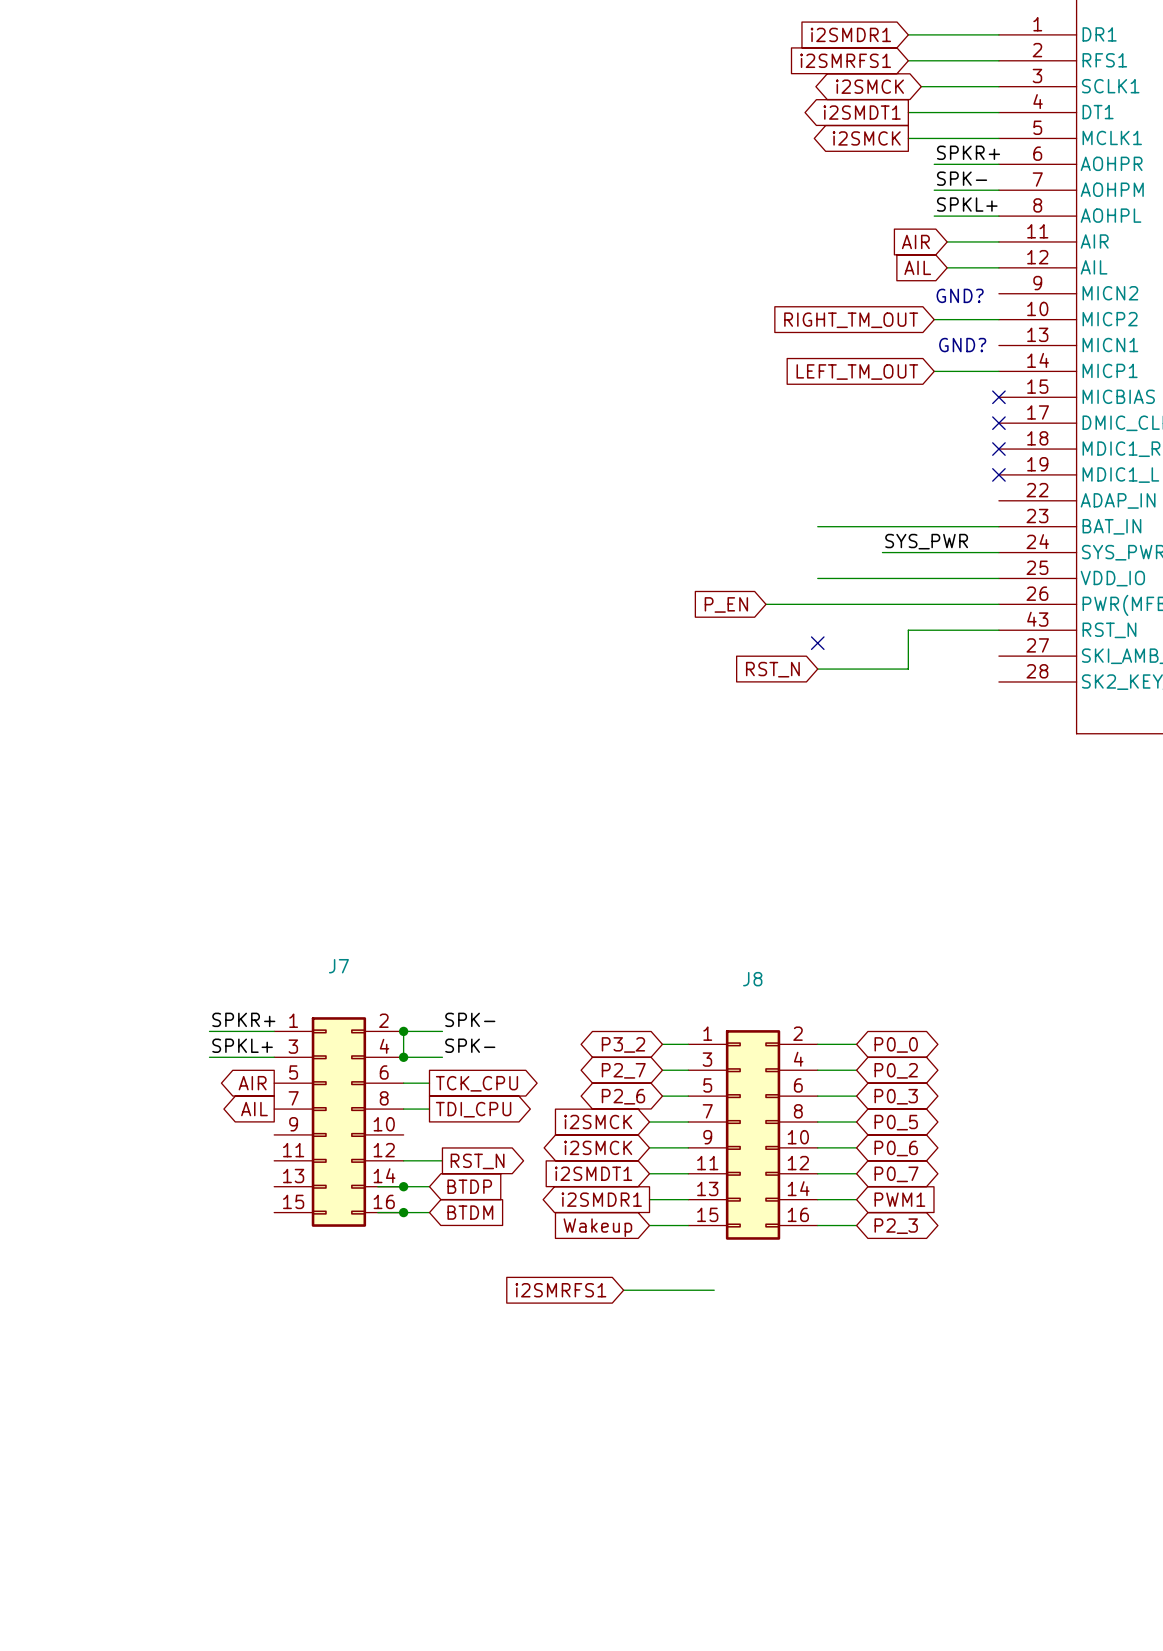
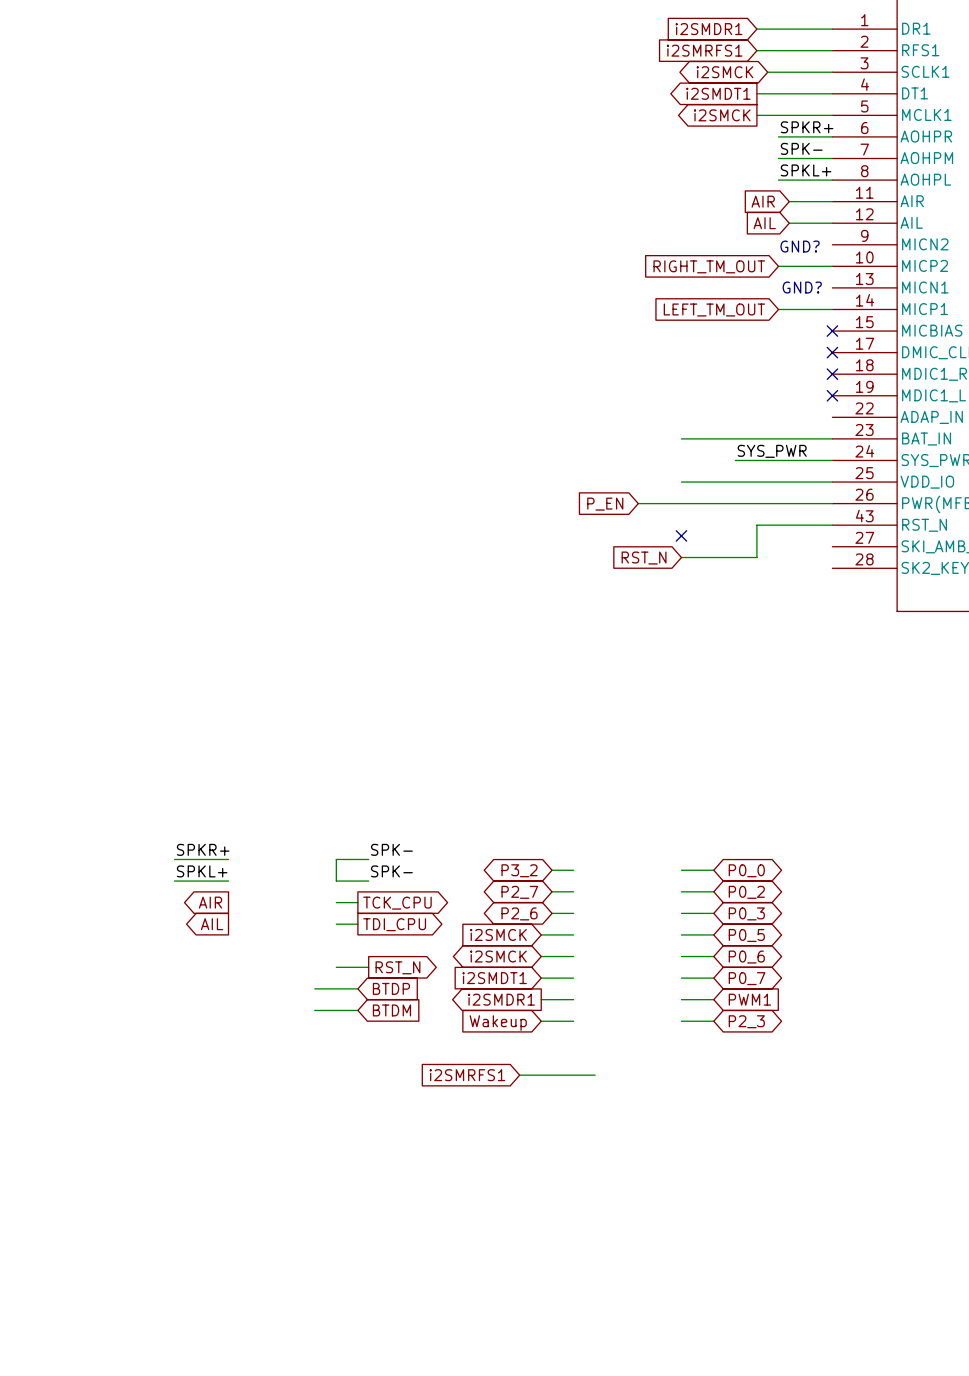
junction: (403, 1031) -> none
junction: (403, 1057) -> none
J7: (338, 1122) -> none
J8: (753, 1134) -> none
junction: (403, 1186) -> none
junction: (403, 1212) -> none

